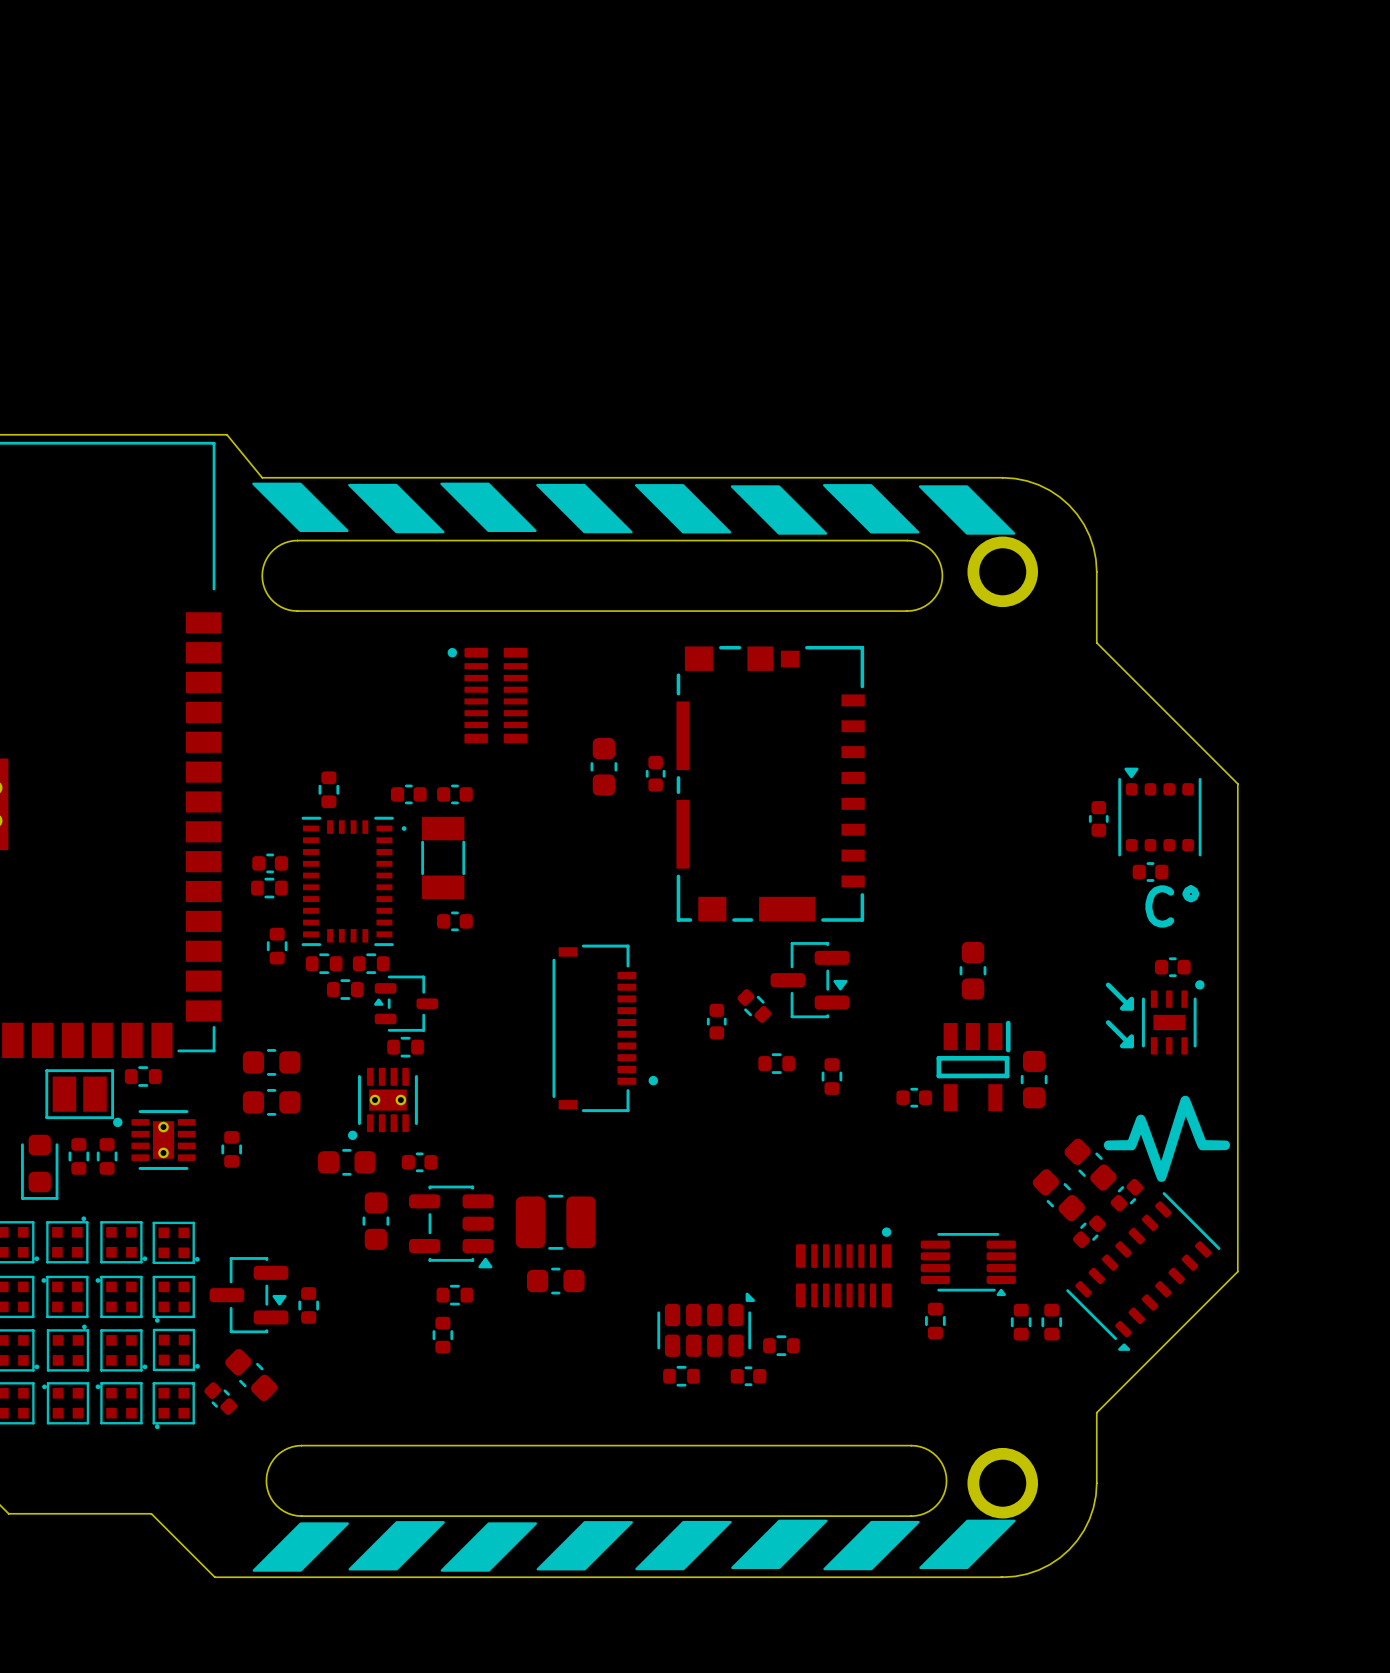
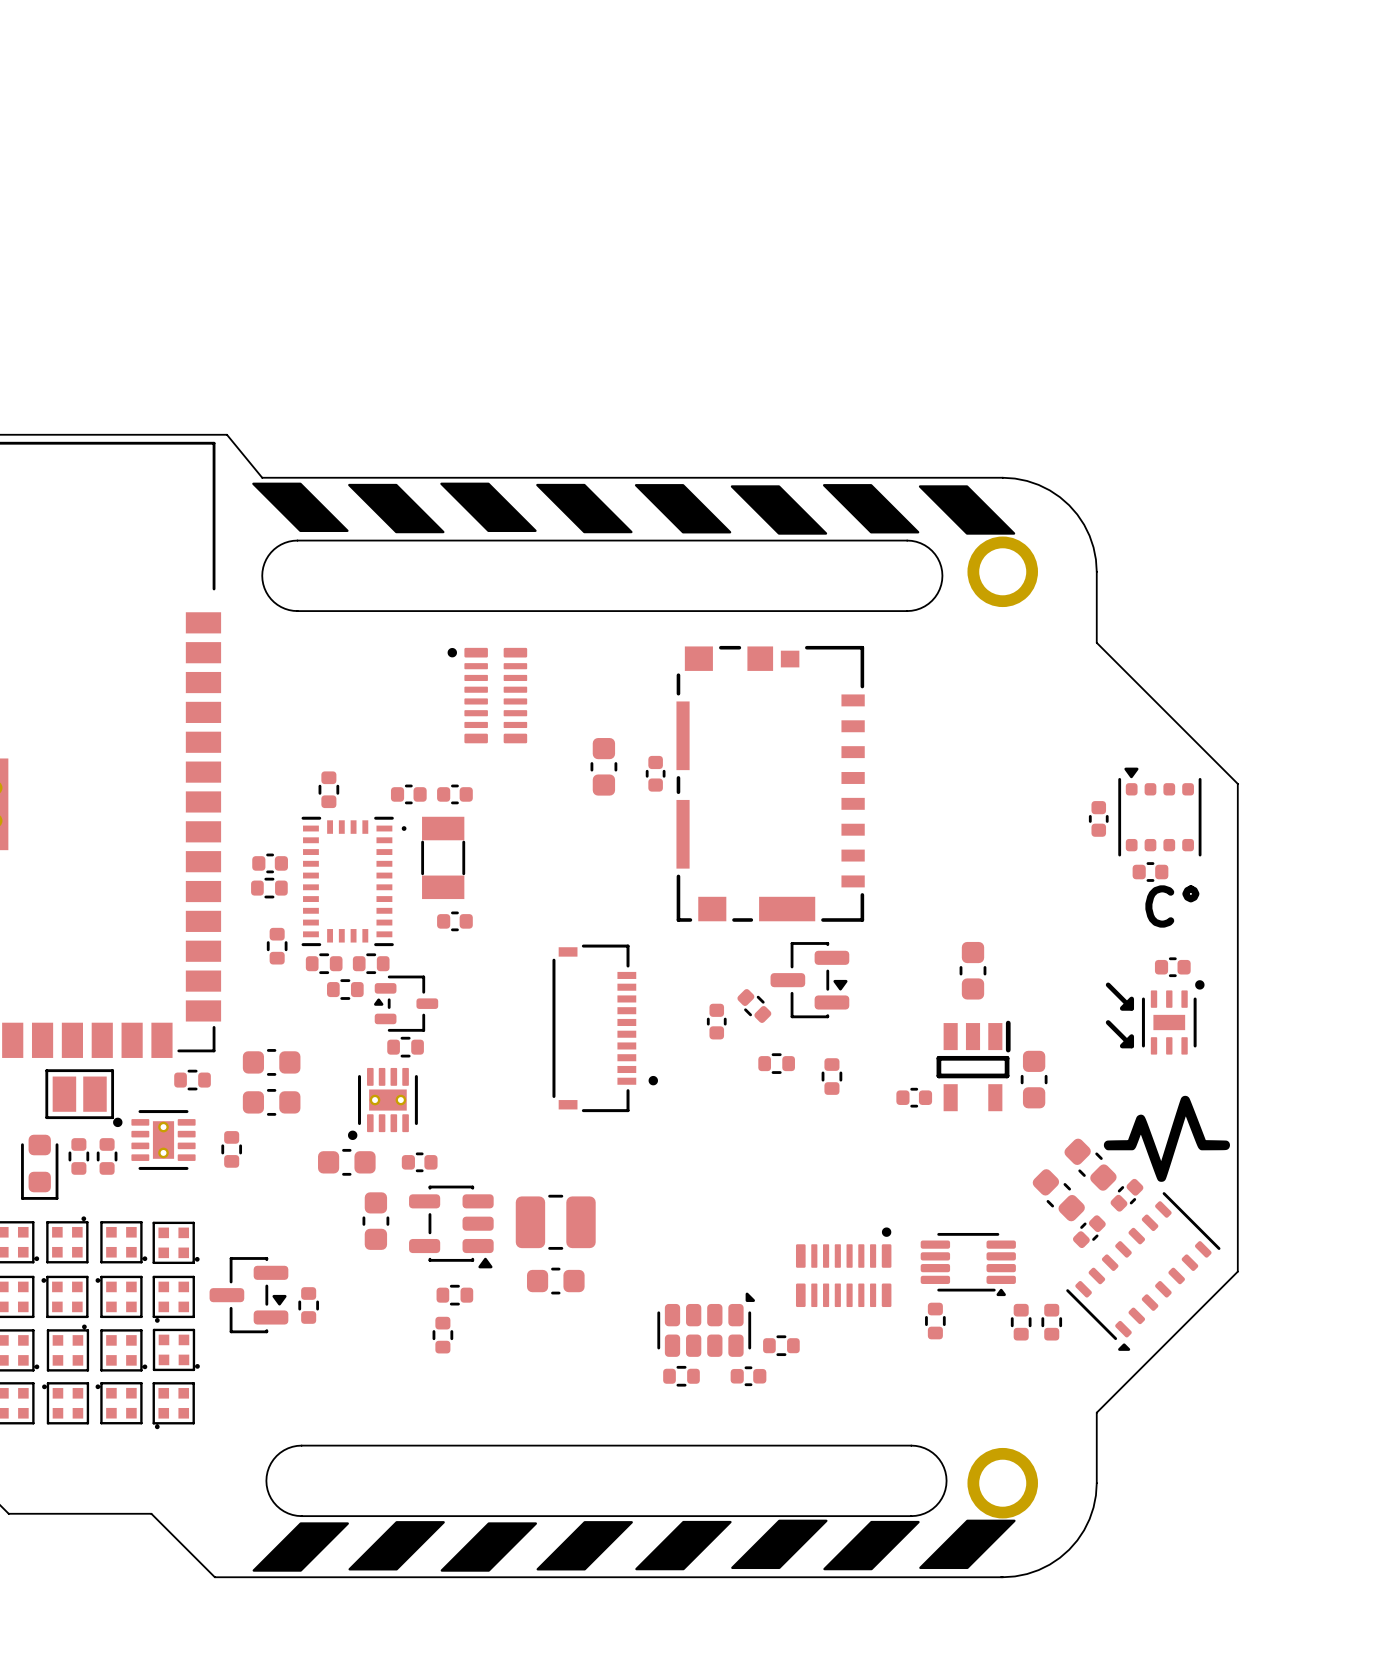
part position: (143, 1076) -> (192, 1080)
part: (251, 1375) -> none
part: (220, 1398) -> none

